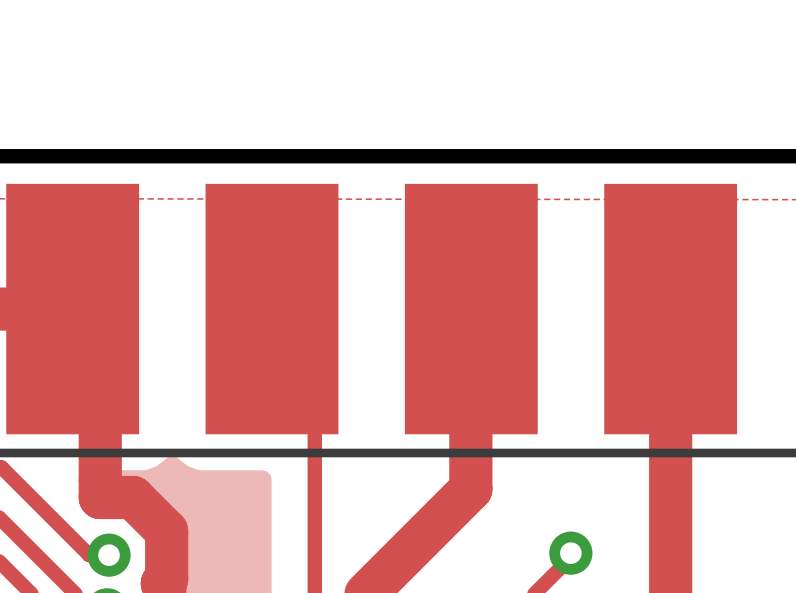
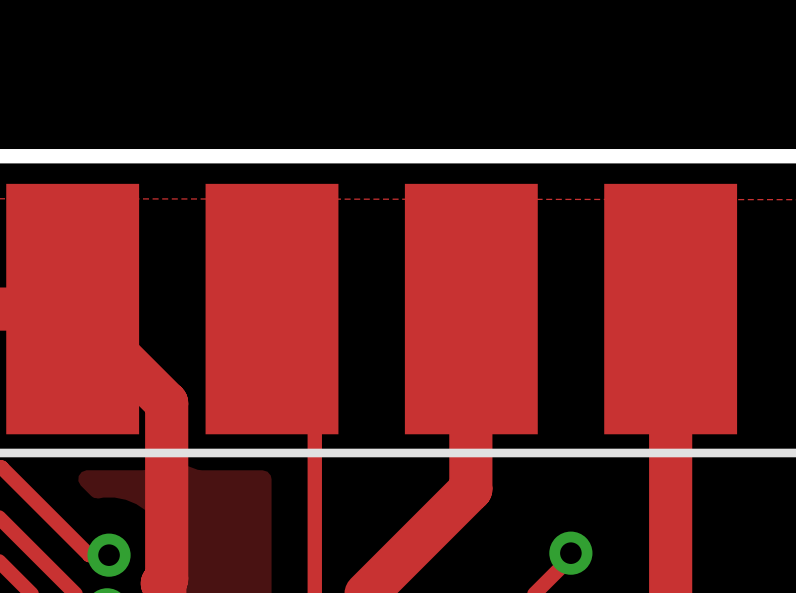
track: (100, 336) (100, 497) (132, 497) (166, 531) -> (100, 336) (166, 403) (166, 531)

